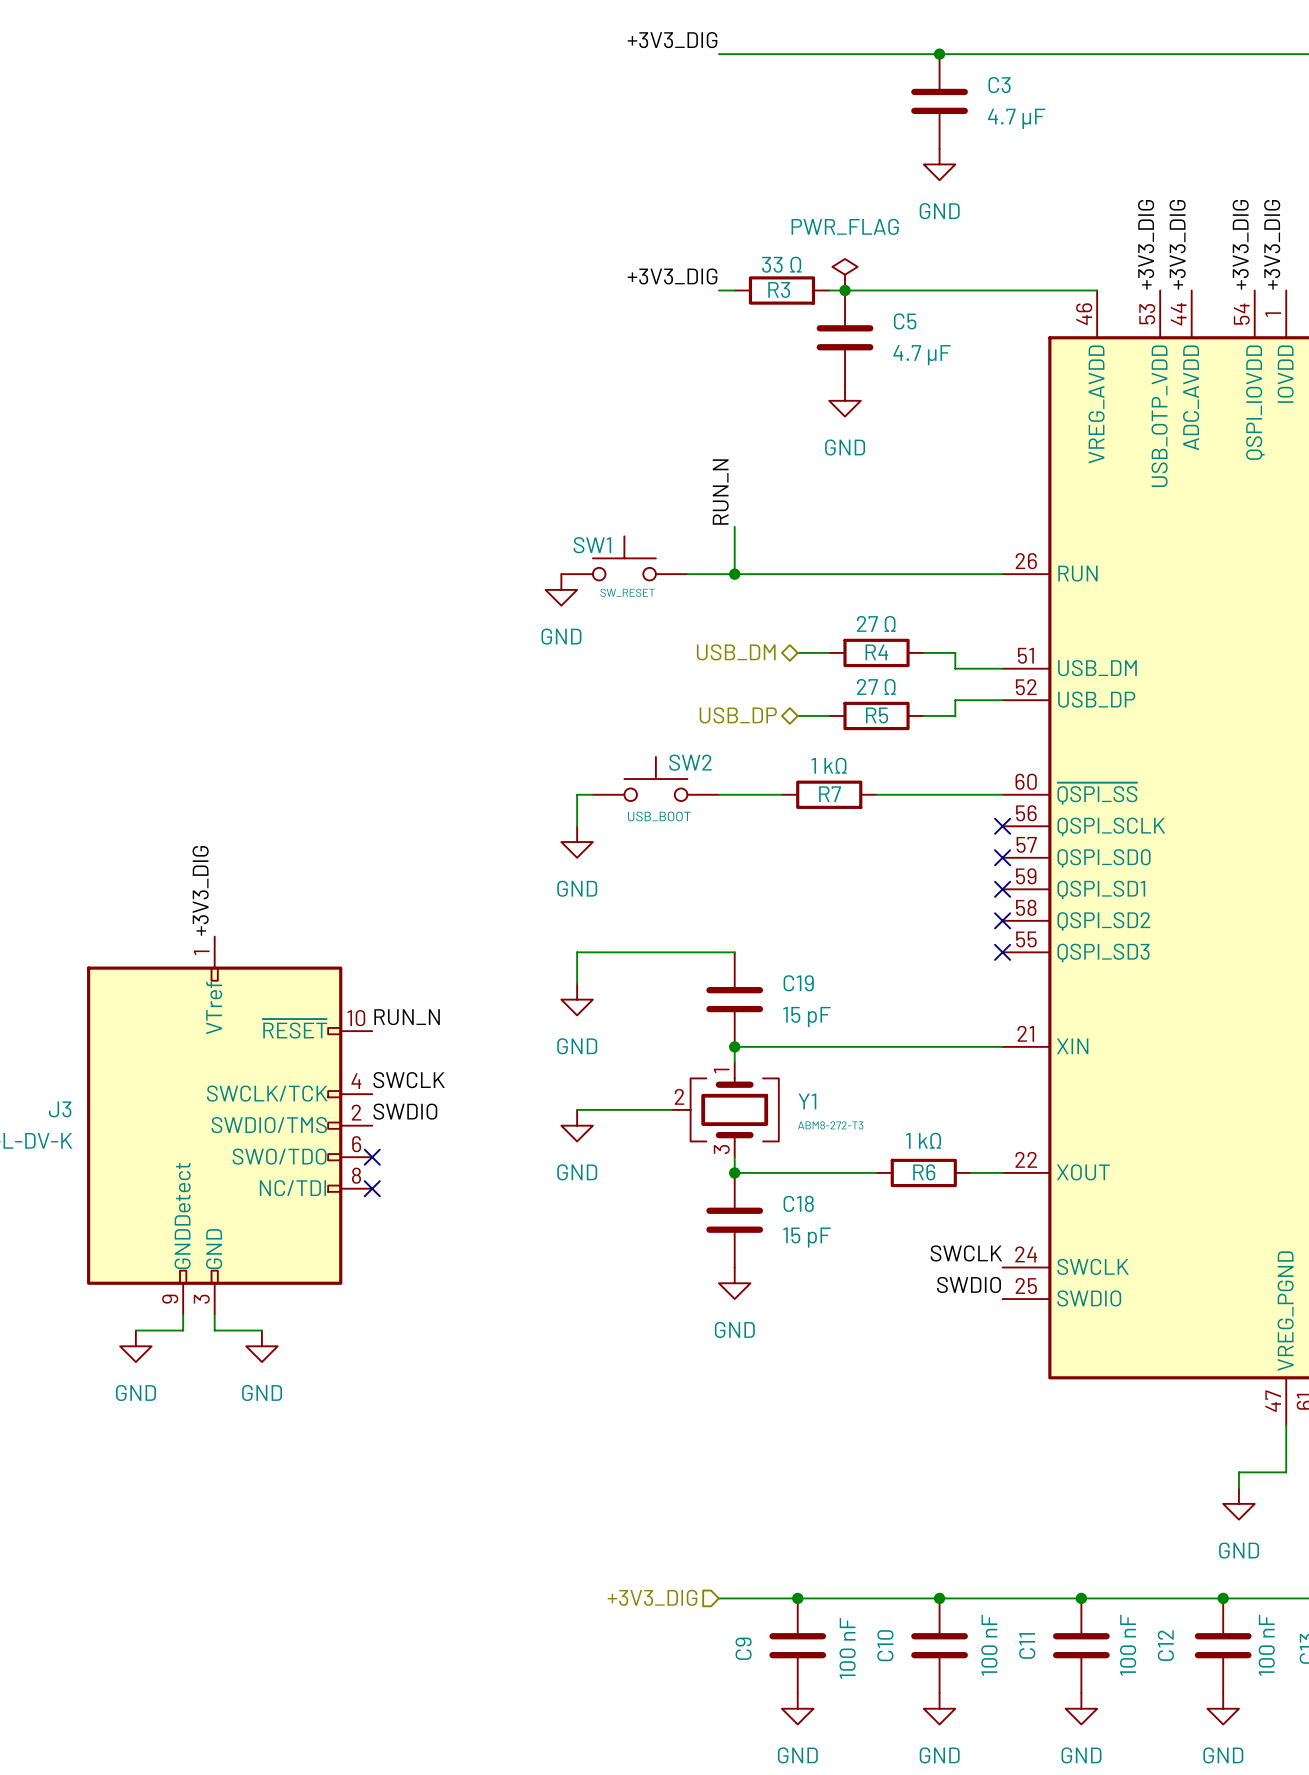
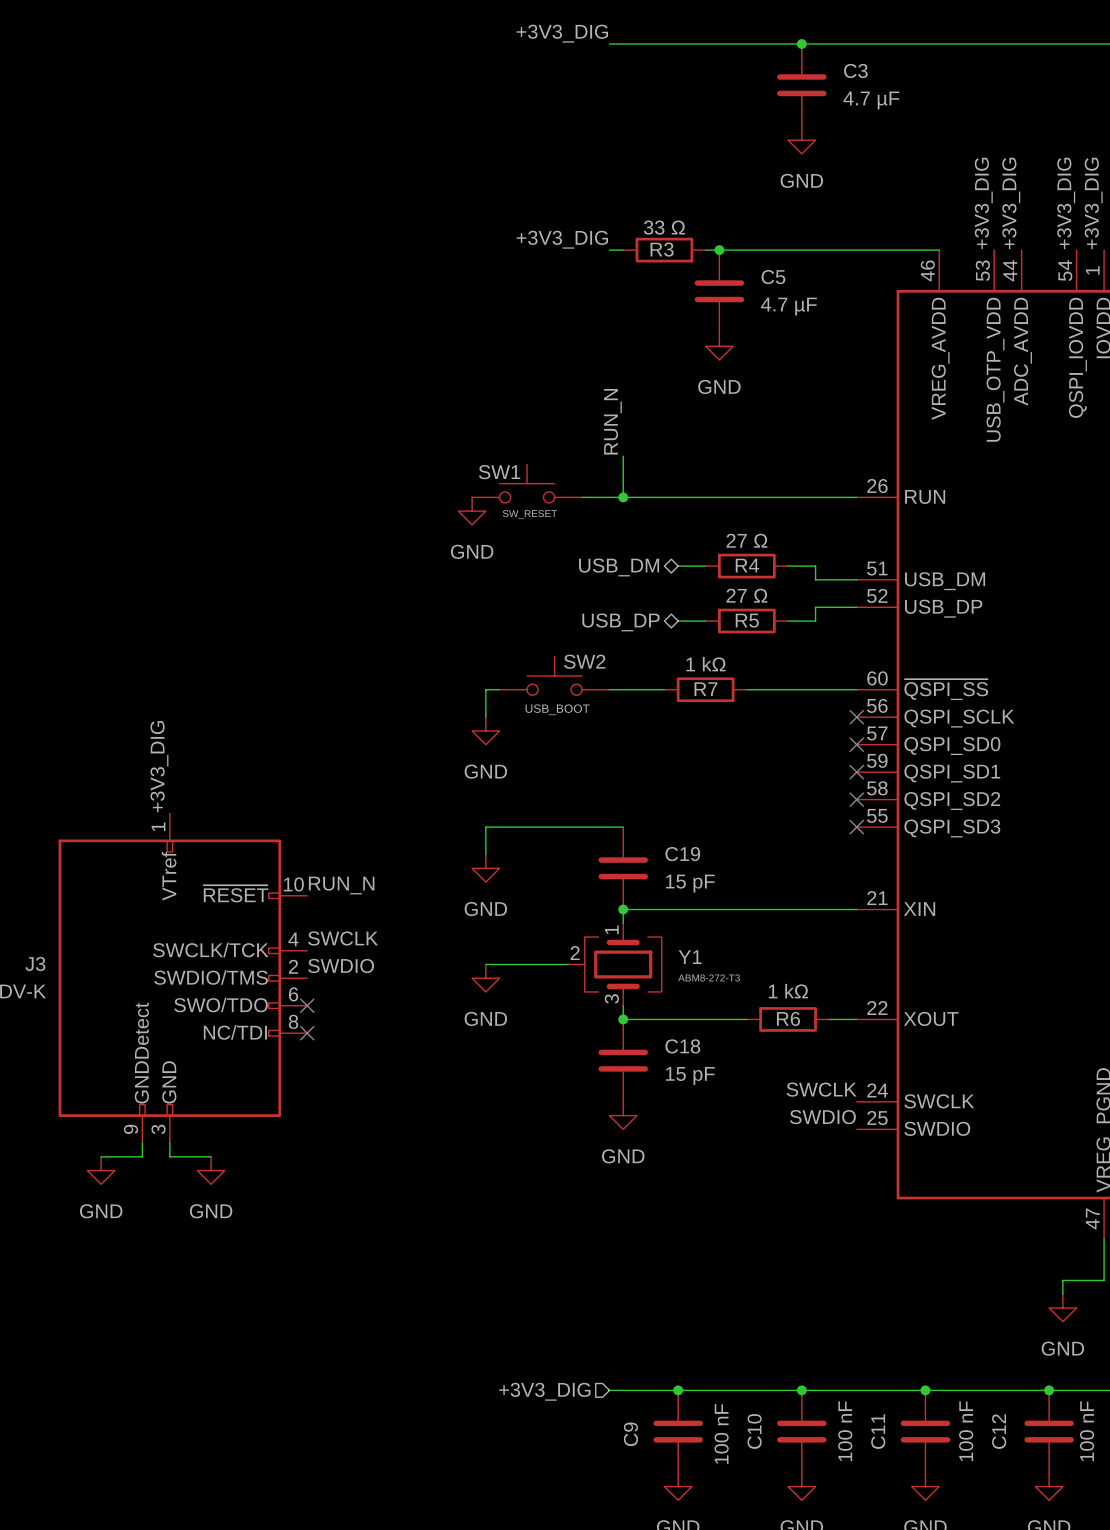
power symbol: PWR_FLAG (845, 274) -> none

